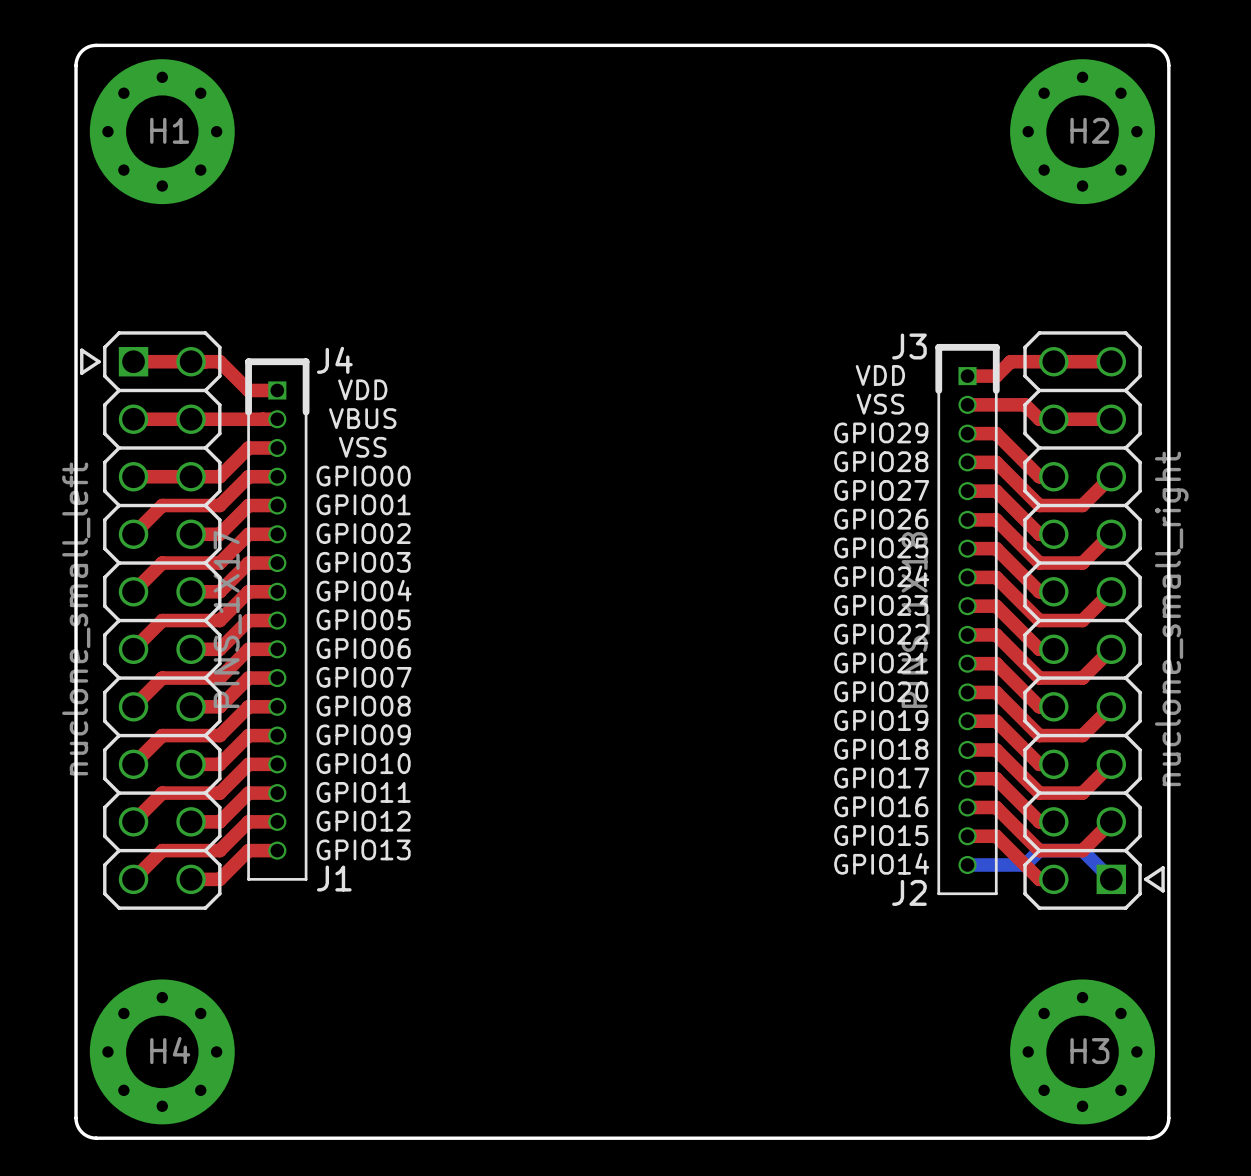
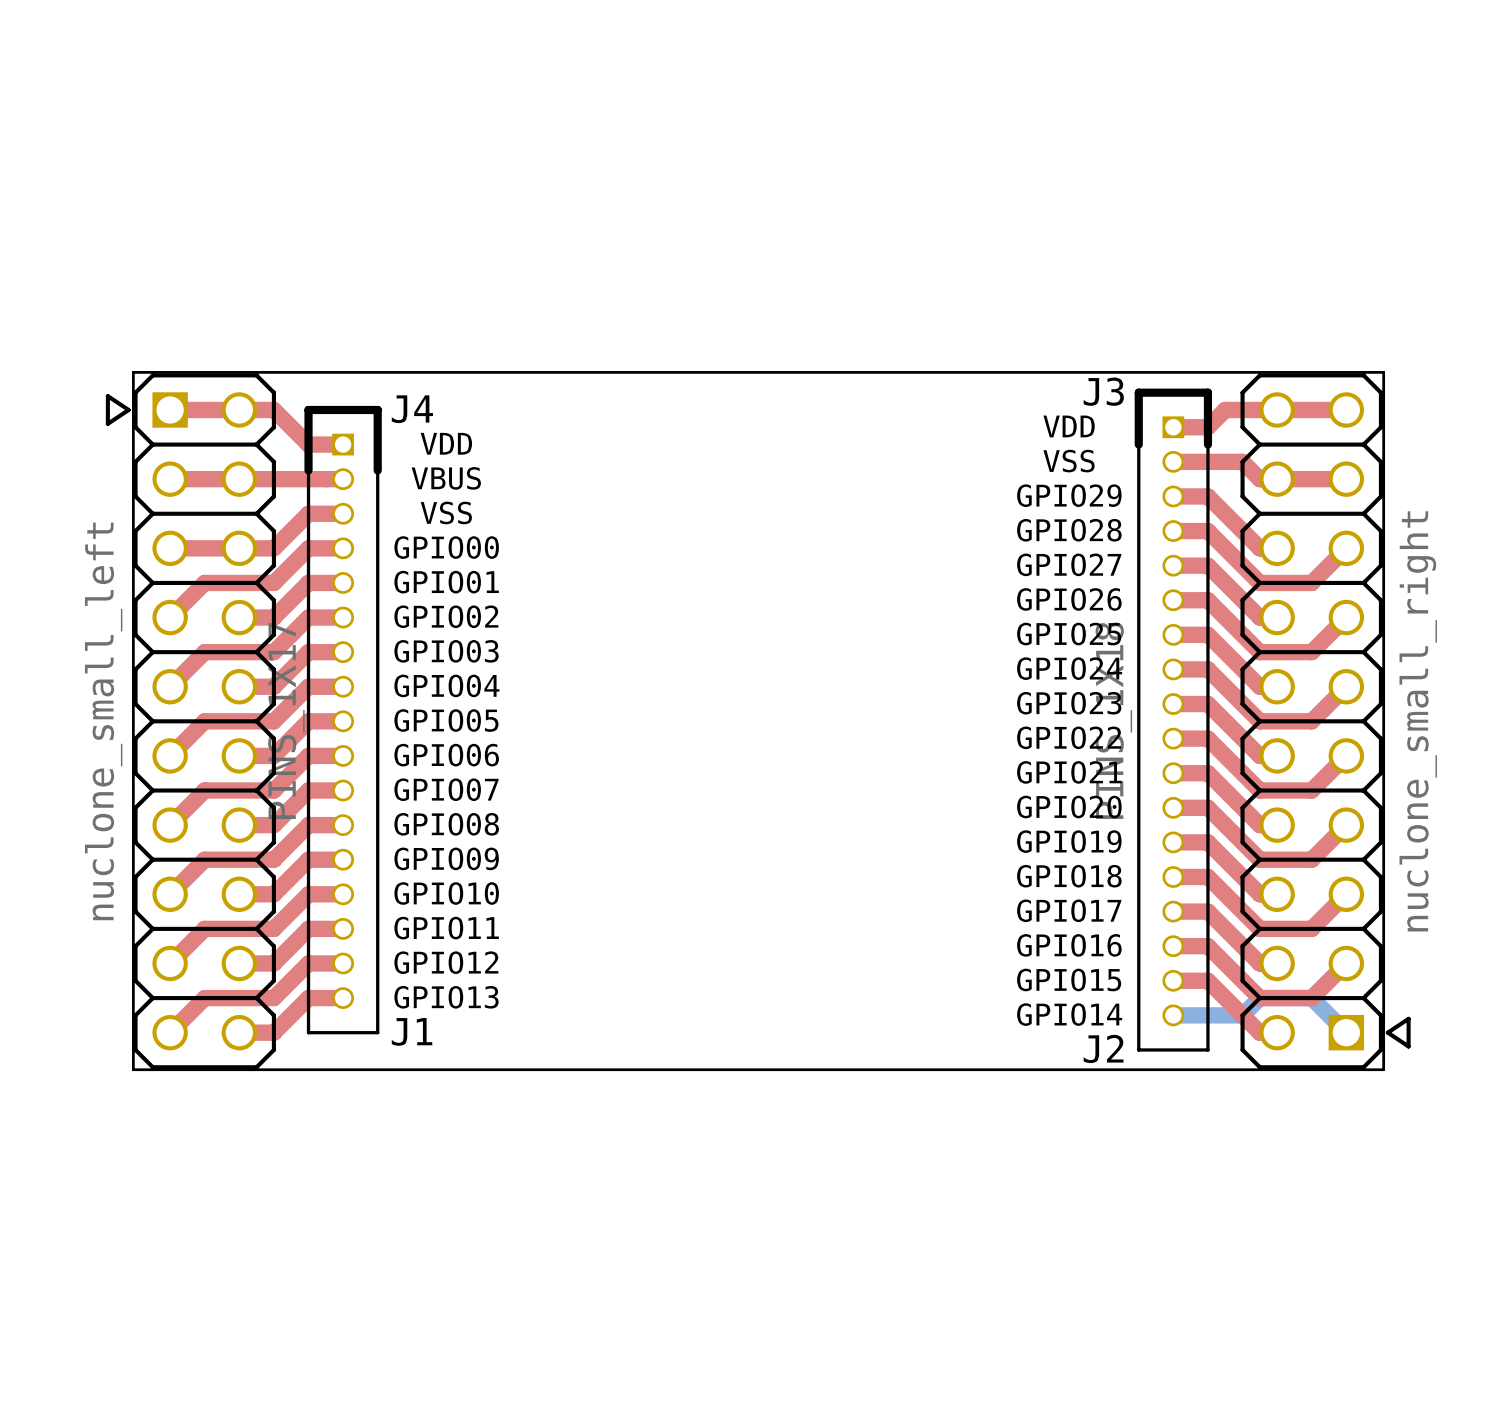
board edge: (96, 45) (1148, 45) (1156, 46) (1162, 51) (1167, 57) (1168, 65) (1168, 1118) (1167, 1125) (1162, 1132) (1156, 1136) (1148, 1138) (96, 1138) (88, 1136) (81, 1132) (77, 1125) (76, 1118) (76, 65) (77, 57) (81, 51) (88, 46) (96, 45) -> (133, 372) (133, 1069) (1383, 1069) (1383, 372) (133, 372)
H1: (162, 131) -> none
H2: (1082, 131) -> none
H4: (162, 1051) -> none
H3: (1082, 1051) -> none

